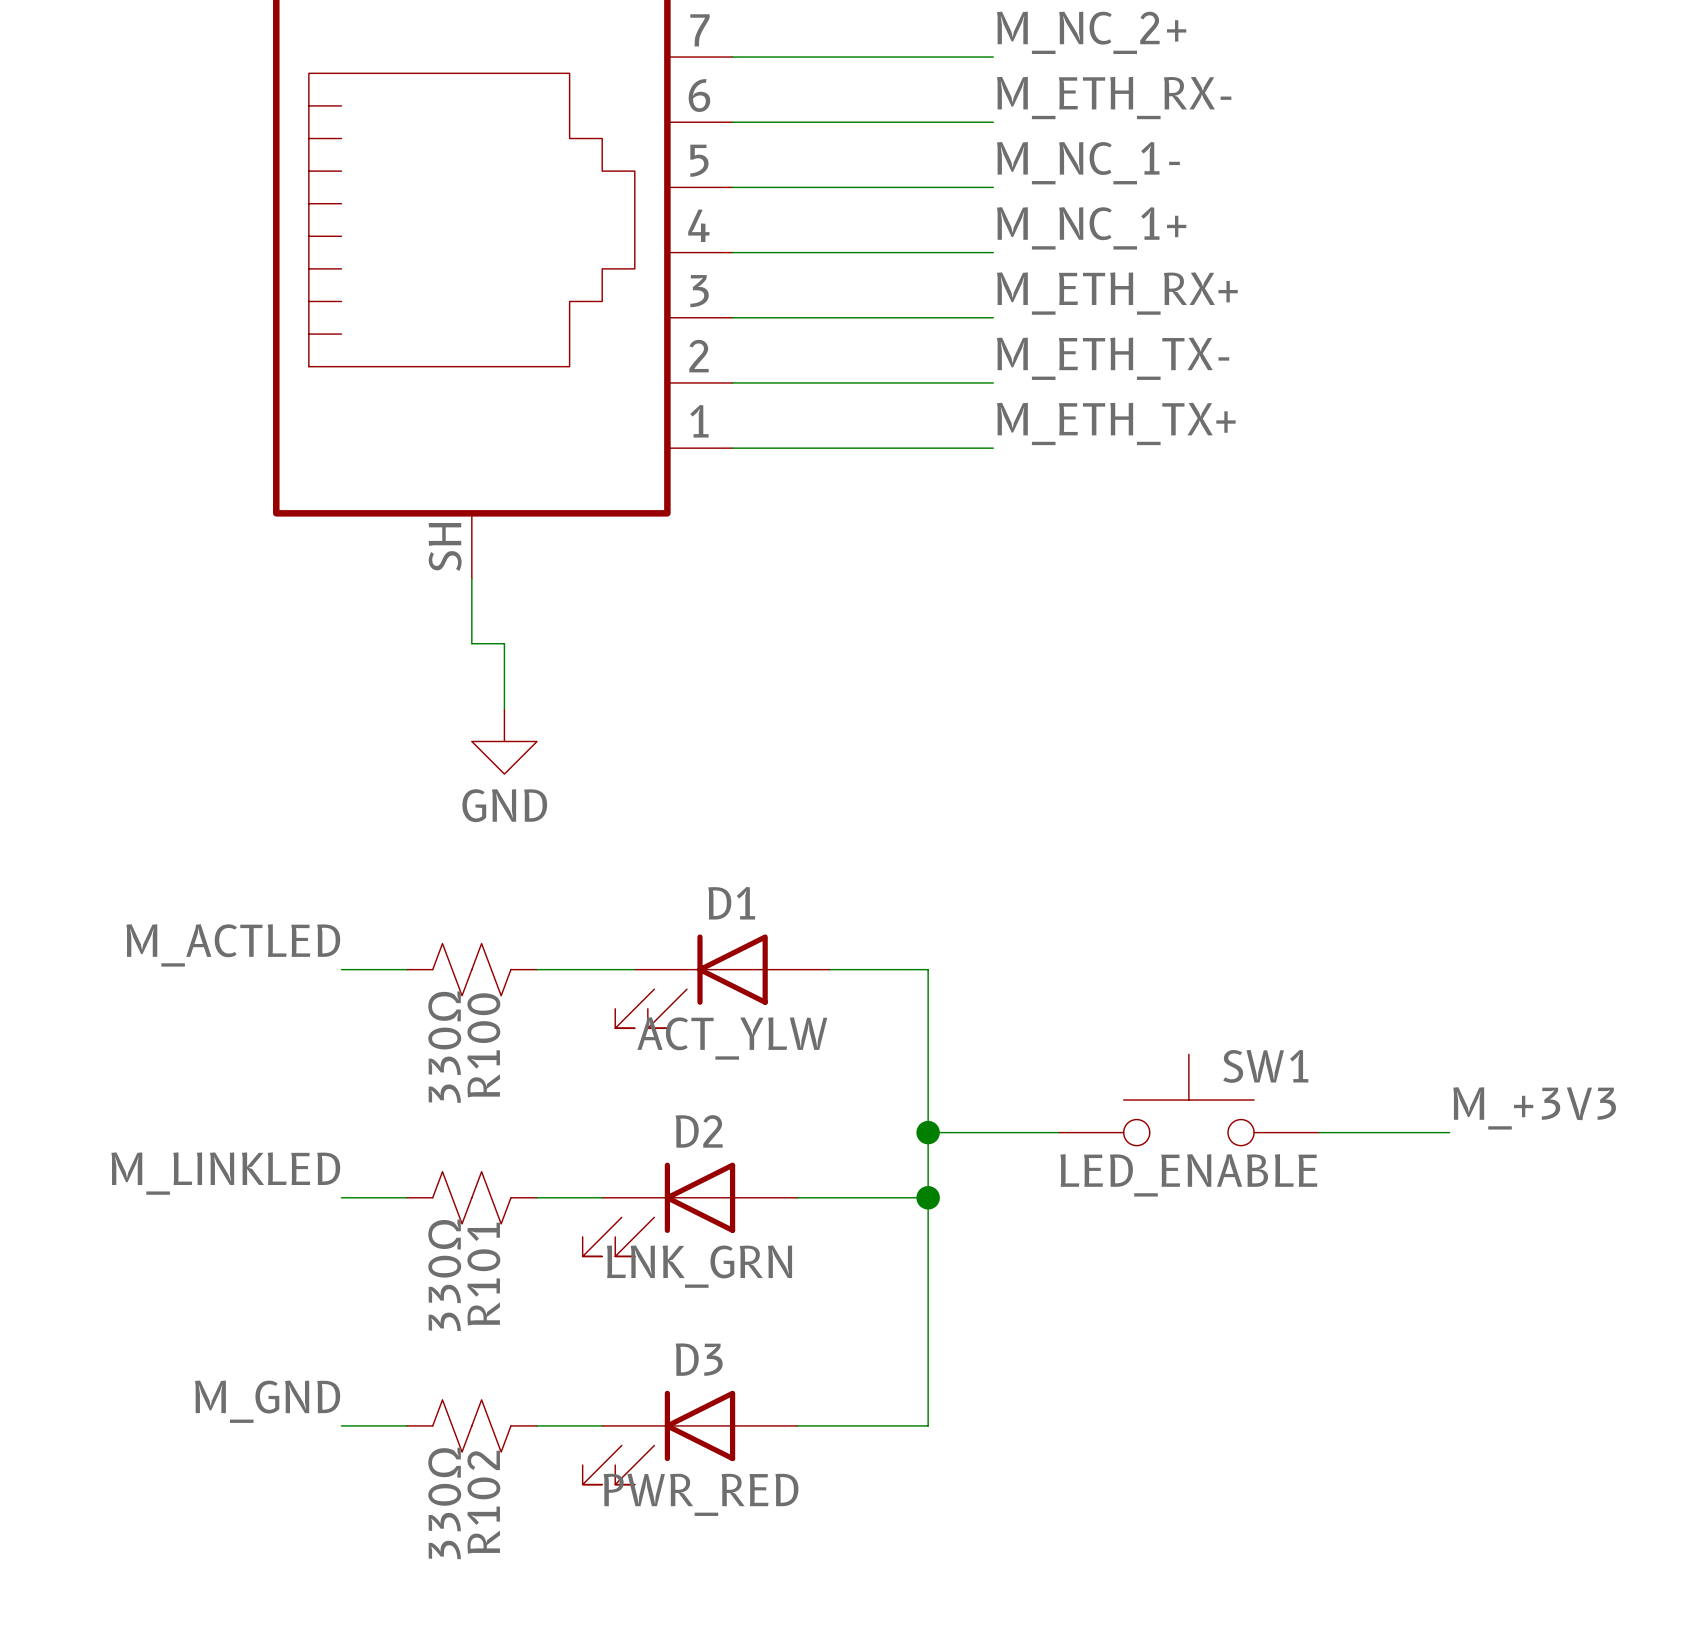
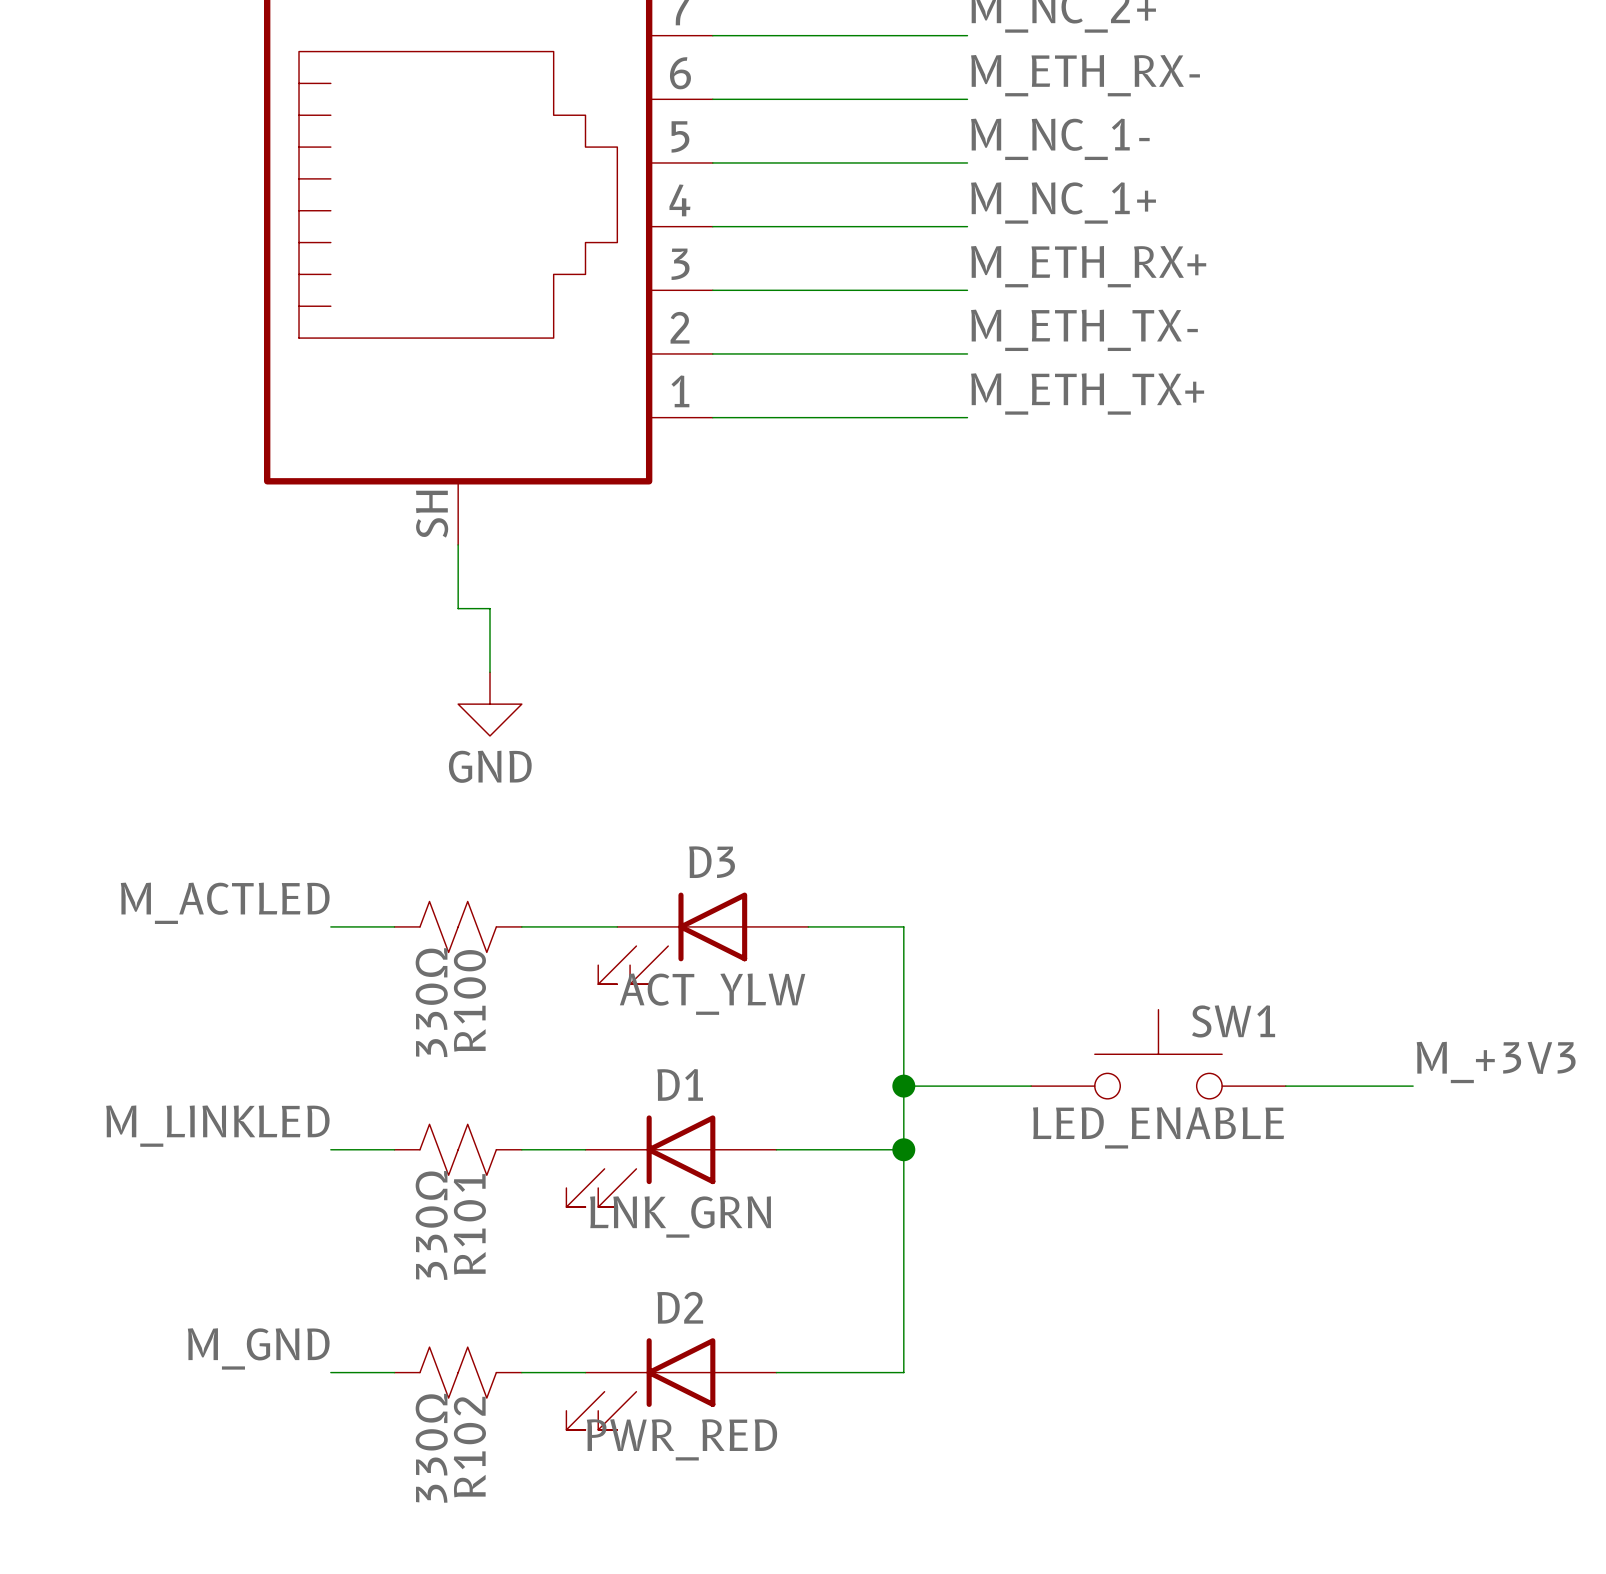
D1 name: D1 (731, 903) -> D3 (712, 862)
D2 name: D2 (699, 1131) -> D1 (680, 1084)
D3 name: D3 (699, 1359) -> D2 (680, 1307)

